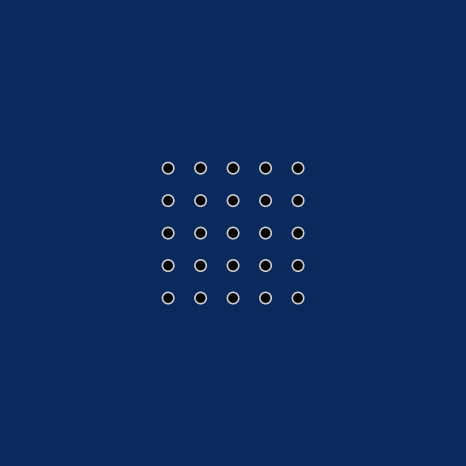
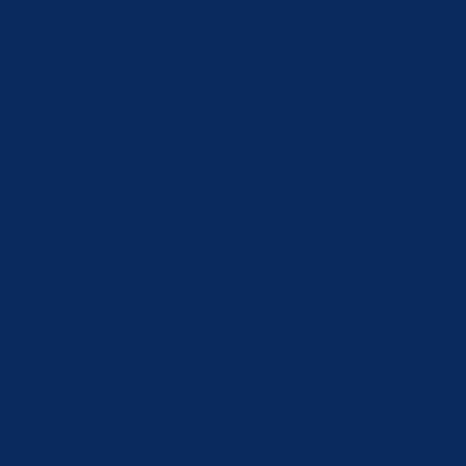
part: (233, 233) -> none

